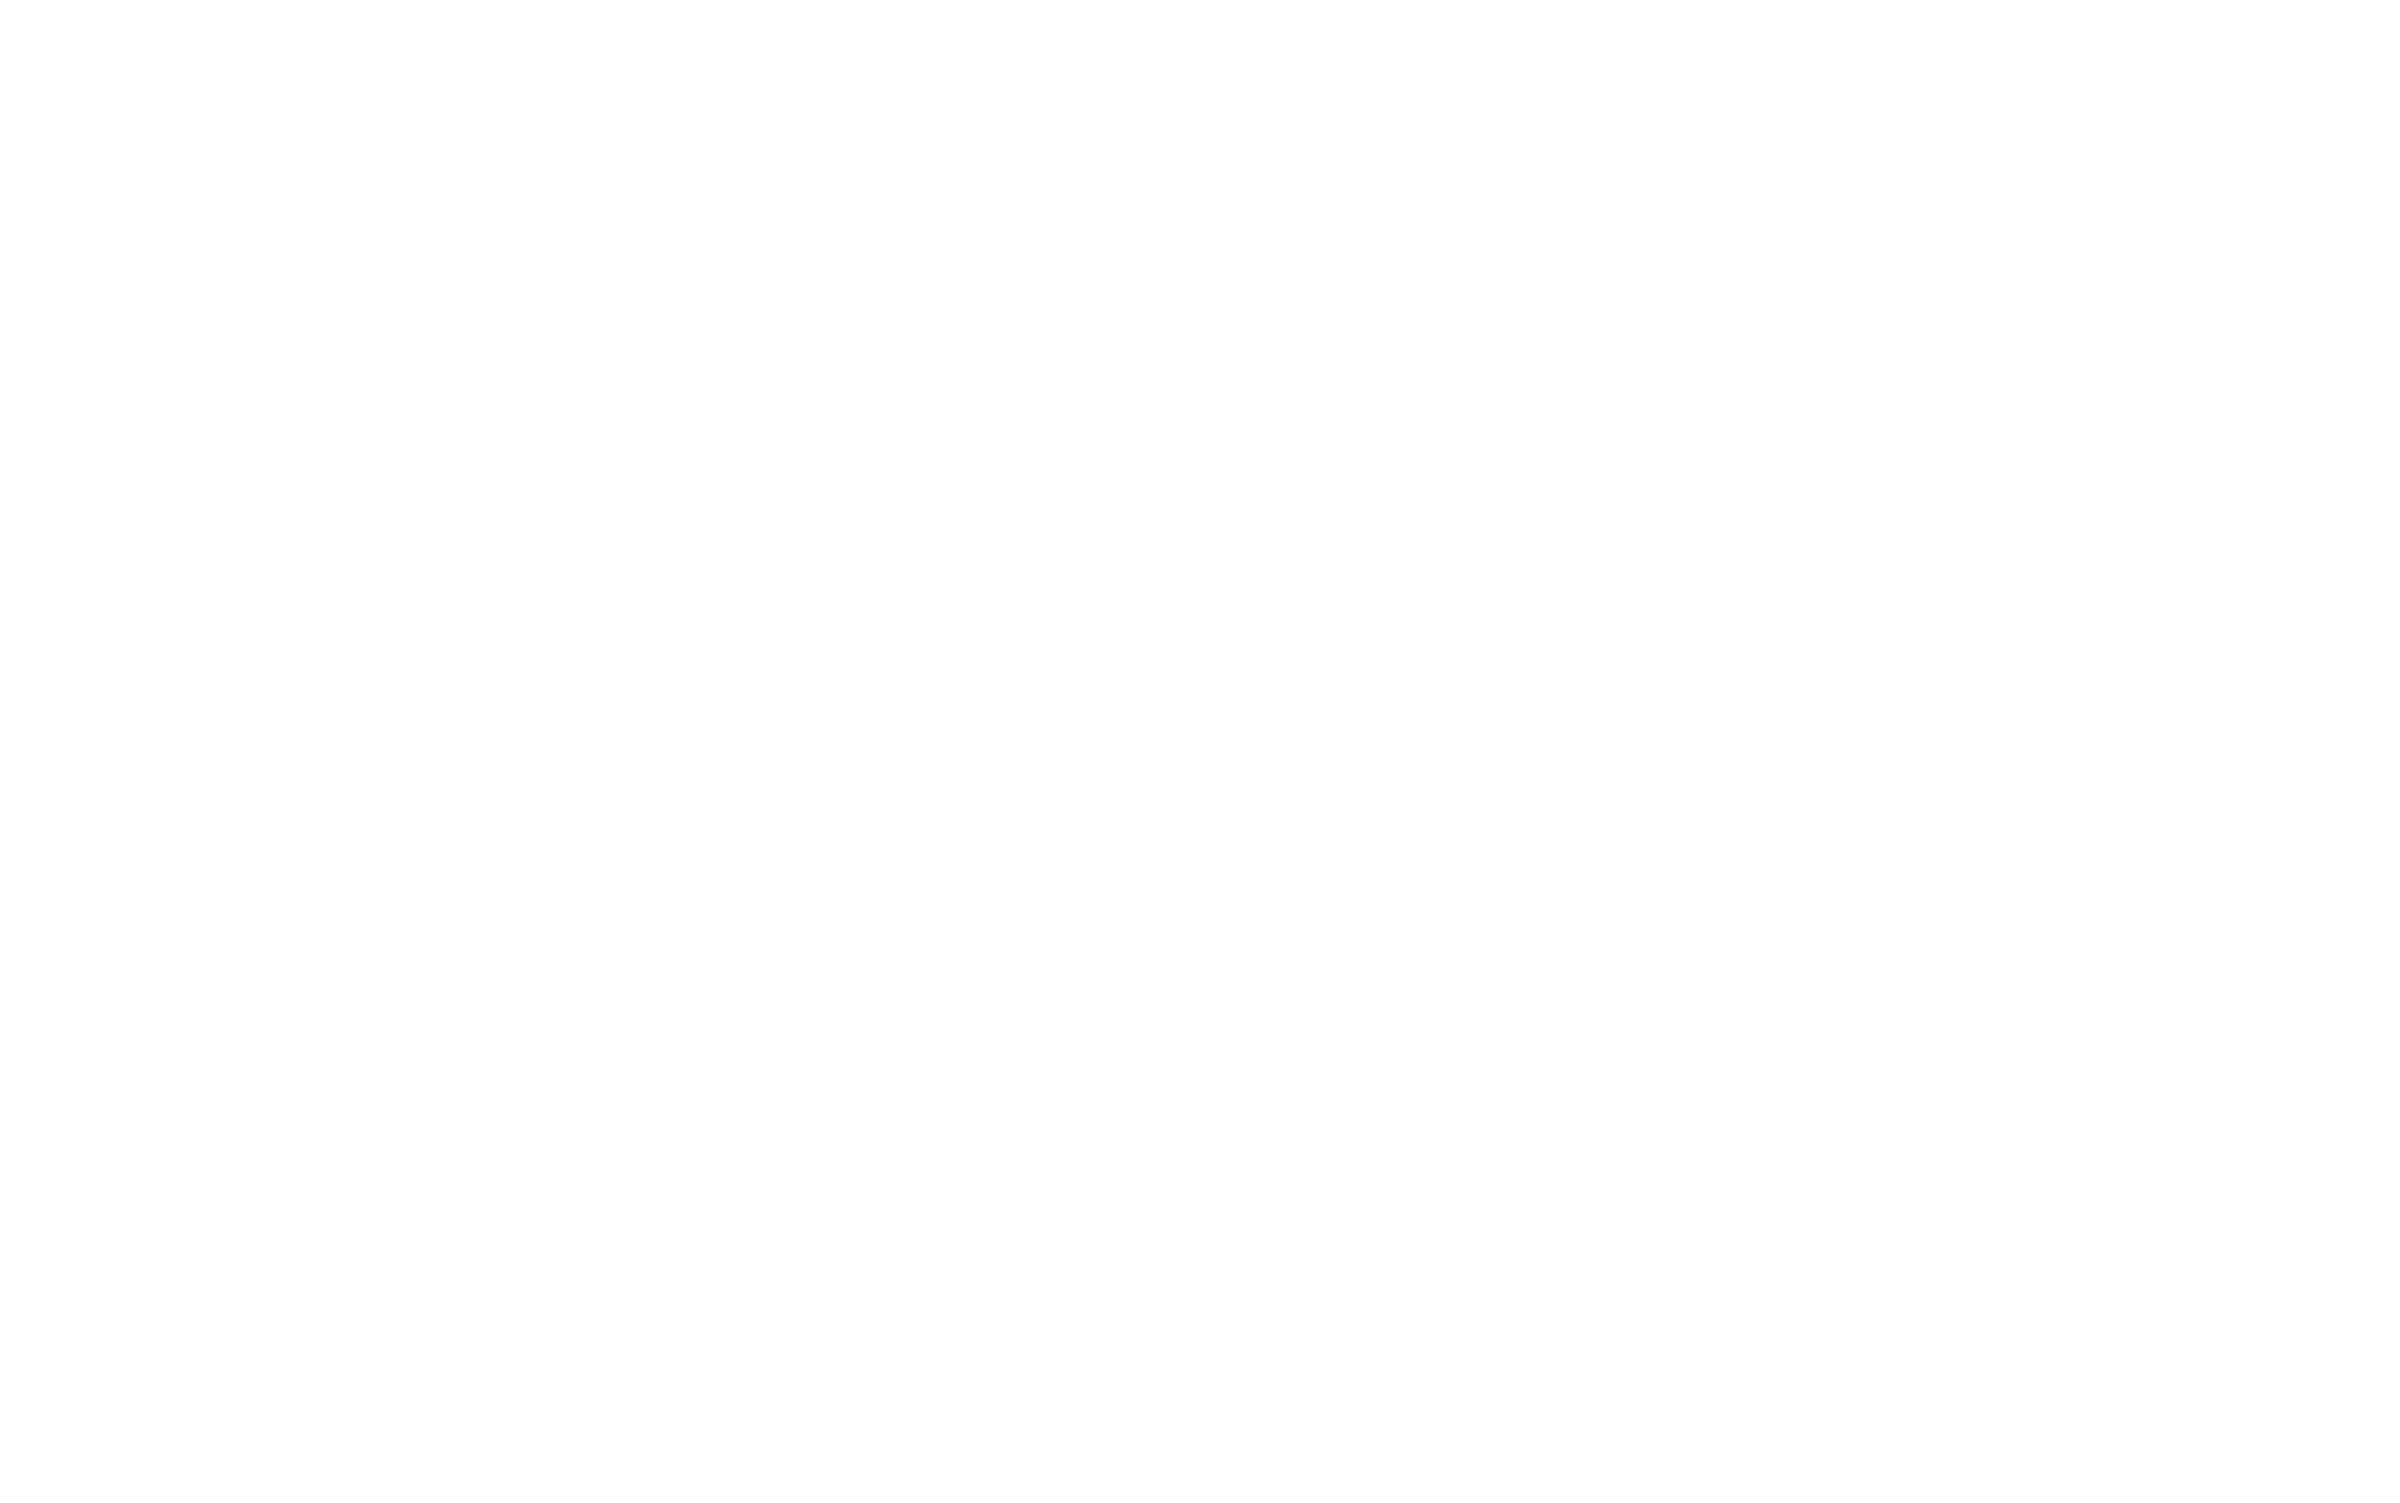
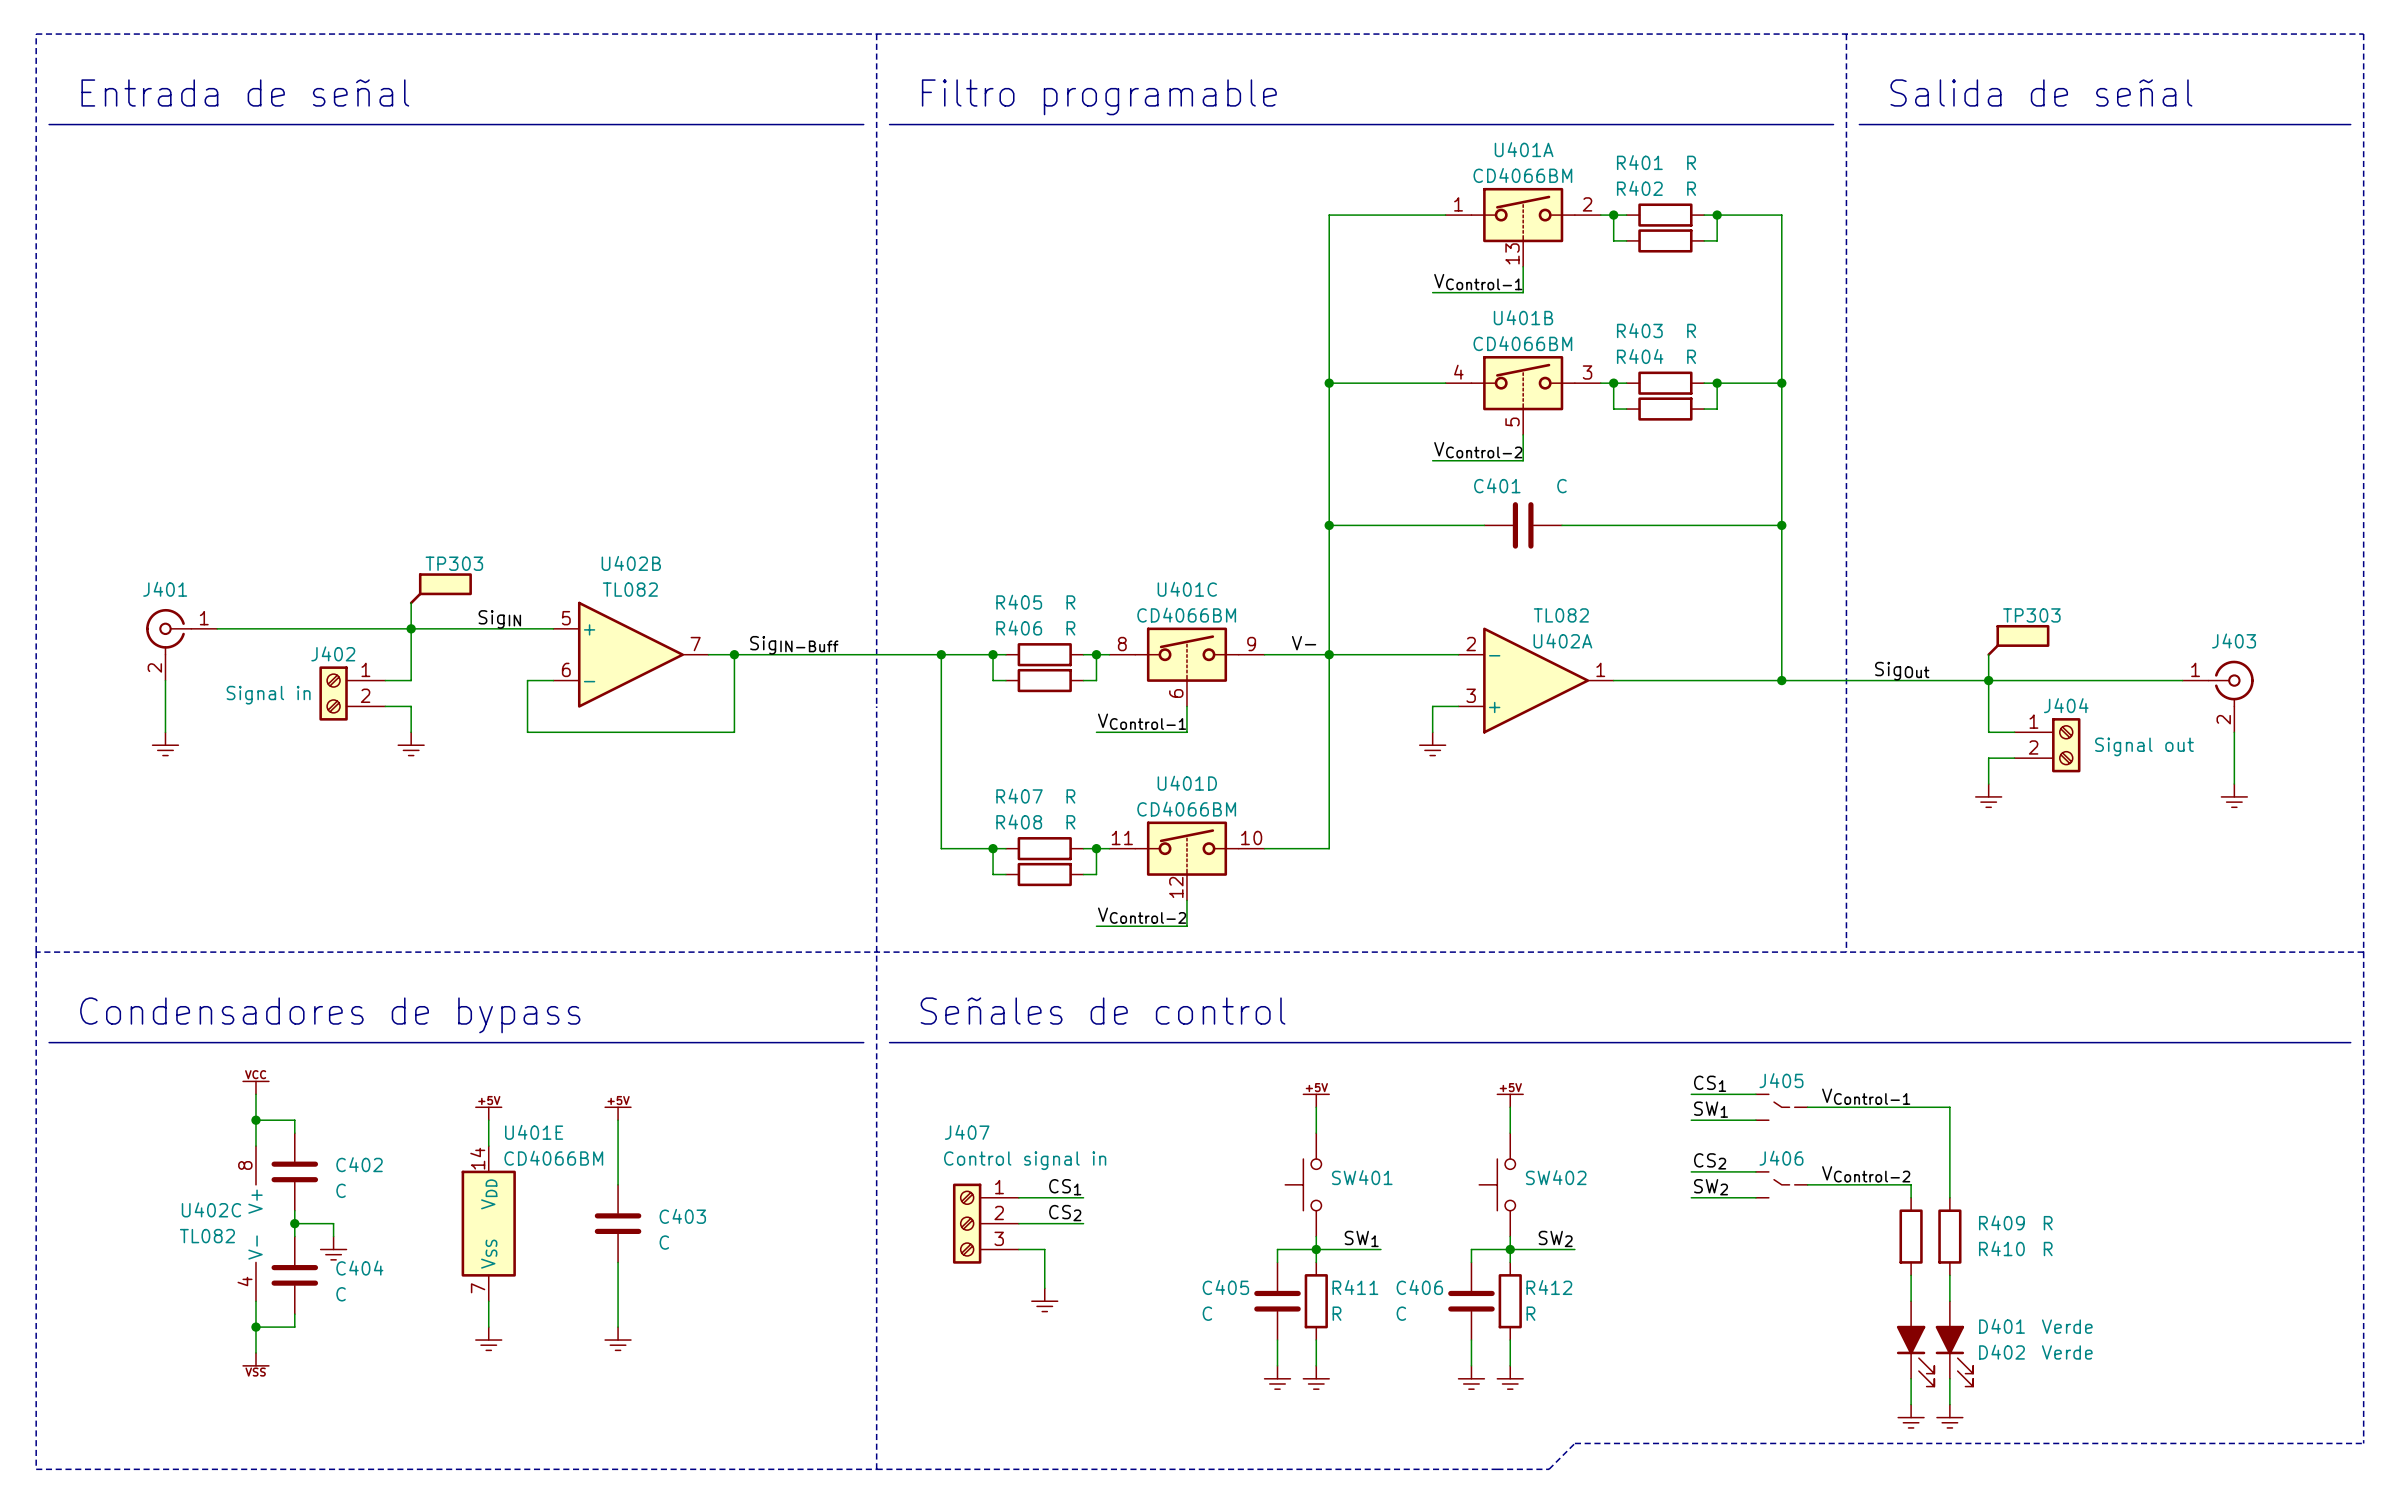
line: none -> (36, 34) (36, 1469) (1549, 1469) (1574, 1443) (2363, 1443) (2363, 34) (36, 34)
line: none -> (876, 34) (876, 1469)
line: none -> (1846, 34) (1846, 952)
text: none -> Entrada de señal (245, 92)
text: none -> Salida de señal (2041, 92)
text: none -> Filtro programable (1099, 97)
line: none -> (49, 124) (863, 124)
line: none -> (889, 124) (1833, 124)
line: none -> (1859, 124) (2350, 124)
wire: none -> (1445, 215) (1329, 215) (1329, 848) (1264, 848)
wire: none -> (1600, 215) (1626, 215)
wire: none -> (1613, 215) (1613, 240) (1626, 240)
junction: none -> (1613, 215)
R401: none -> R (1665, 215)
wire: none -> (1704, 215) (1781, 215) (1781, 680)
wire: none -> (1717, 215) (1717, 240) (1704, 240)
junction: none -> (1717, 215)
U401A: none -> CD4066BM (1523, 227)
R402: none -> R (1665, 240)
wire: none -> (1523, 266) (1523, 292) (1432, 292)
label: none -> VControl-1 (1478, 282)
wire: none -> (1329, 383) (1445, 383)
junction: none -> (1329, 383)
wire: none -> (1600, 383) (1626, 383)
wire: none -> (1613, 383) (1613, 409) (1626, 409)
junction: none -> (1613, 383)
R403: none -> R (1665, 383)
wire: none -> (1704, 383) (1781, 383)
wire: none -> (1717, 383) (1717, 409) (1704, 409)
junction: none -> (1717, 383)
junction: none -> (1781, 383)
U401B: none -> CD4066BM (1523, 395)
R404: none -> R (1665, 409)
wire: none -> (1523, 434) (1523, 460) (1432, 460)
label: none -> VControl-2 (1478, 450)
wire: none -> (1329, 525) (1484, 525)
junction: none -> (1329, 525)
C401: none -> C (1523, 525)
wire: none -> (1561, 525) (1781, 525)
junction: none -> (1781, 525)
TP303: none -> (440, 588)
wire: none -> (411, 602) (411, 680) (385, 680)
label: none -> SigIN (499, 619)
wire: none -> (217, 628) (553, 628)
junction: none -> (411, 628)
TP303: none -> (2018, 640)
label: none -> V- (1304, 643)
J401: none -> (181, 644)
label: none -> SigIN-Buff (794, 645)
U402B: none -> TL082 (630, 654)
wire: none -> (708, 654) (1005, 654)
wire: none -> (734, 654) (734, 732) (527, 732) (527, 680) (553, 680)
junction: none -> (734, 654)
wire: none -> (941, 654) (941, 848) (1005, 848)
junction: none -> (941, 654)
wire: none -> (993, 654) (993, 680) (1005, 680)
junction: none -> (993, 654)
R405: none -> R (1044, 654)
wire: none -> (1083, 654) (1109, 654)
wire: none -> (1096, 654) (1096, 680) (1083, 680)
junction: none -> (1096, 654)
wire: none -> (1264, 654) (1458, 654)
junction: none -> (1329, 654)
wire: none -> (1988, 654) (1988, 732) (2014, 732)
U401C: none -> CD4066BM (1186, 666)
label: none -> SigOut (1902, 671)
wire: none -> (165, 680) (165, 732)
R406: none -> R (1044, 680)
U402A: none -> TL082 (1536, 680)
wire: none -> (1613, 680) (2182, 680)
junction: none -> (1781, 680)
junction: none -> (1988, 680)
J402: none -> (352, 693)
J403: none -> (2218, 696)
wire: none -> (385, 706) (411, 706) (411, 732)
wire: none -> (1186, 706) (1186, 732) (1096, 732)
wire: none -> (1458, 706) (1432, 706) (1432, 732)
label: none -> VControl-1 (1142, 721)
wire: none -> (2234, 732) (2234, 784)
power symbol: none -> (165, 743)
power symbol: none -> (411, 743)
power symbol: none -> (1432, 743)
J404: none -> (2047, 745)
wire: none -> (2014, 758) (1988, 758) (1988, 784)
power symbol: none -> (1988, 795)
power symbol: none -> (2234, 795)
wire: none -> (993, 848) (993, 874) (1005, 874)
junction: none -> (993, 848)
R407: none -> R (1044, 848)
wire: none -> (1083, 848) (1109, 848)
wire: none -> (1096, 848) (1096, 874) (1083, 874)
junction: none -> (1096, 848)
U401D: none -> CD4066BM (1186, 860)
R408: none -> R (1044, 874)
wire: none -> (1186, 900) (1186, 926) (1096, 926)
label: none -> VControl-2 (1142, 915)
line: none -> (36, 952) (2363, 952)
text: none -> Señales de control (1103, 1011)
text: none -> Condensadores de bypass (330, 1015)
line: none -> (49, 1042) (863, 1042)
line: none -> (889, 1042) (2350, 1042)
label: none -> CS1 (1710, 1083)
power symbol: none -> (255, 1087)
wire: none -> (255, 1094) (255, 1146)
wire: none -> (1691, 1094) (1755, 1094)
label: none -> VControl-1 (1866, 1096)
power symbol: none -> (1316, 1100)
power symbol: none -> (1510, 1100)
wire: none -> (1316, 1107) (1316, 1133)
wire: none -> (1510, 1107) (1510, 1133)
J405: none -> (1781, 1107)
wire: none -> (1807, 1107) (1949, 1107) (1949, 1197)
label: none -> SW1 (1711, 1109)
power symbol: none -> (488, 1113)
power symbol: none -> (618, 1113)
wire: none -> (255, 1120) (294, 1120) (294, 1133)
junction: none -> (255, 1120)
wire: none -> (488, 1120) (488, 1146)
wire: none -> (618, 1120) (618, 1184)
wire: none -> (1691, 1120) (1755, 1120)
label: none -> CS2 (1710, 1161)
C402: none -> C (294, 1171)
wire: none -> (1691, 1171) (1755, 1171)
label: none -> VControl-2 (1866, 1174)
SW401: none -> (1303, 1184)
SW402: none -> (1497, 1184)
J406: none -> (1781, 1184)
wire: none -> (1807, 1184) (1911, 1184) (1911, 1197)
label: none -> CS1 (1065, 1187)
label: none -> SW2 (1711, 1187)
wire: none -> (1018, 1197) (1083, 1197)
wire: none -> (1691, 1197) (1755, 1197)
wire: none -> (294, 1210) (294, 1236)
label: none -> CS2 (1065, 1213)
U402C: none -> TL082 (255, 1223)
wire: none -> (294, 1223) (333, 1223) (333, 1236)
junction: none -> (294, 1223)
U401E: none -> CD4066BM (488, 1223)
C403: none -> C (618, 1223)
J407: none -> (985, 1223)
wire: none -> (1018, 1223) (1083, 1223)
wire: none -> (1316, 1236) (1316, 1262)
wire: none -> (1510, 1236) (1510, 1262)
R409: none -> R (1911, 1236)
R410: none -> R (1949, 1236)
label: none -> SW1 (1361, 1238)
label: none -> SW2 (1555, 1238)
power symbol: none -> (333, 1248)
wire: none -> (1018, 1249) (1044, 1249) (1044, 1288)
junction: none -> (1316, 1249)
wire: none -> (1380, 1249) (1277, 1249) (1277, 1262)
junction: none -> (1510, 1249)
wire: none -> (1574, 1249) (1471, 1249) (1471, 1262)
wire: none -> (618, 1262) (618, 1327)
C404: none -> C (294, 1275)
wire: none -> (1911, 1275) (1911, 1301)
wire: none -> (1949, 1275) (1949, 1301)
power symbol: none -> (1044, 1299)
wire: none -> (255, 1301) (255, 1352)
wire: none -> (488, 1301) (488, 1327)
C405: none -> C (1277, 1301)
R411: none -> R (1316, 1301)
C406: none -> C (1471, 1301)
R412: none -> R (1510, 1301)
wire: none -> (294, 1314) (294, 1327) (255, 1327)
junction: none -> (255, 1327)
power symbol: none -> (488, 1338)
power symbol: none -> (618, 1338)
wire: none -> (1277, 1340) (1277, 1365)
wire: none -> (1316, 1340) (1316, 1365)
wire: none -> (1471, 1340) (1471, 1365)
wire: none -> (1510, 1340) (1510, 1365)
D401: none -> (1915, 1343)
D402: none -> (1954, 1343)
power symbol: none -> (255, 1359)
power symbol: none -> (1277, 1377)
power symbol: none -> (1316, 1377)
power symbol: none -> (1471, 1377)
power symbol: none -> (1510, 1377)
wire: none -> (1911, 1378) (1911, 1404)
wire: none -> (1949, 1378) (1949, 1404)
power symbol: none -> (1911, 1416)
power symbol: none -> (1949, 1416)

